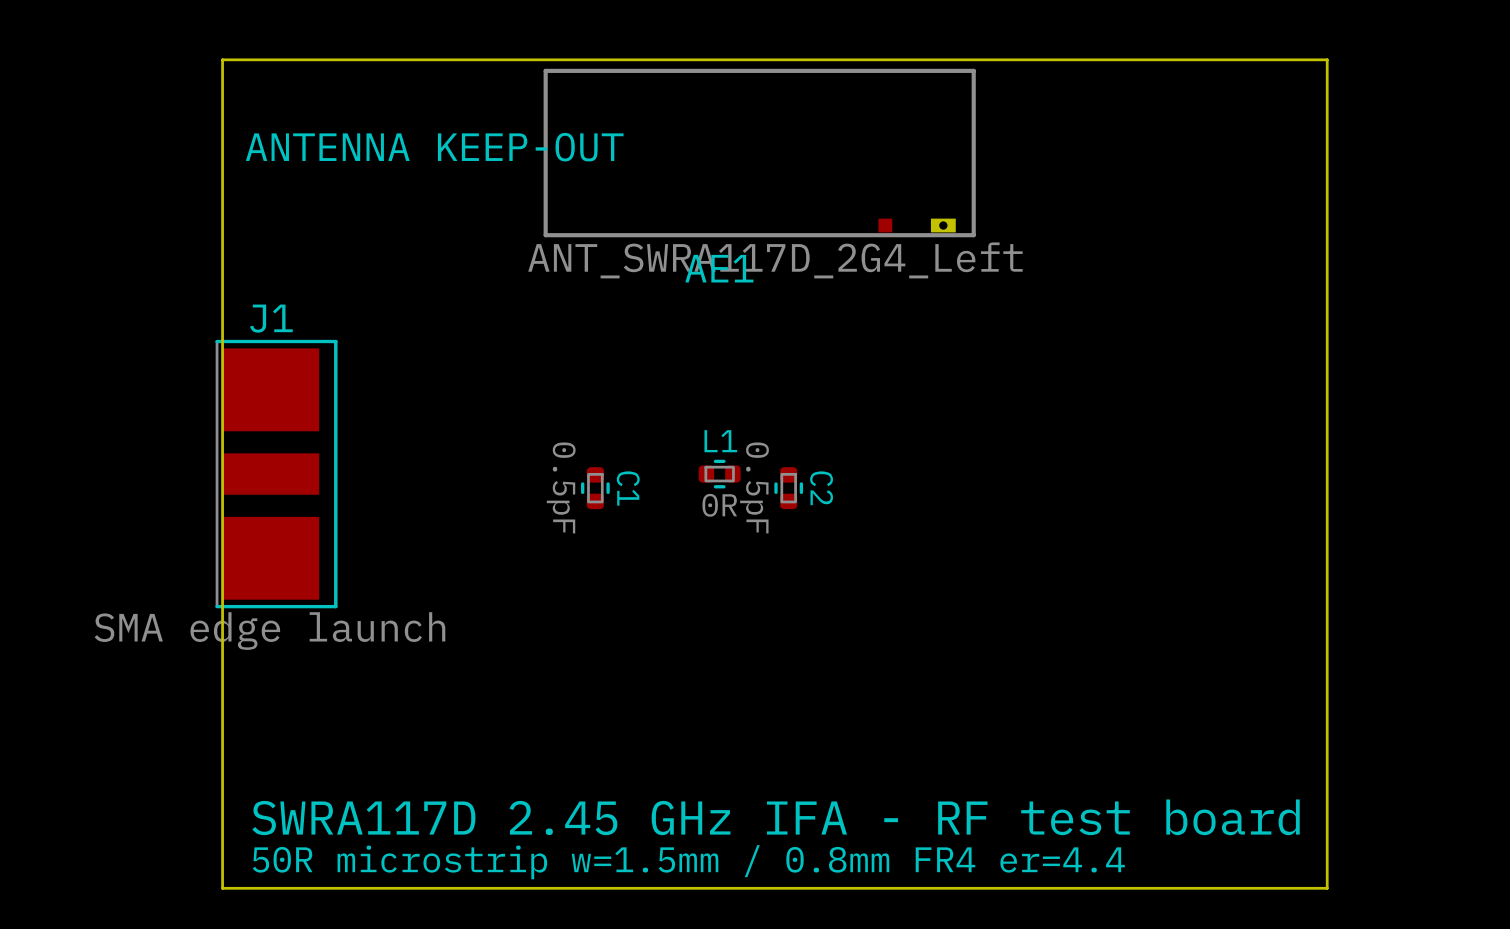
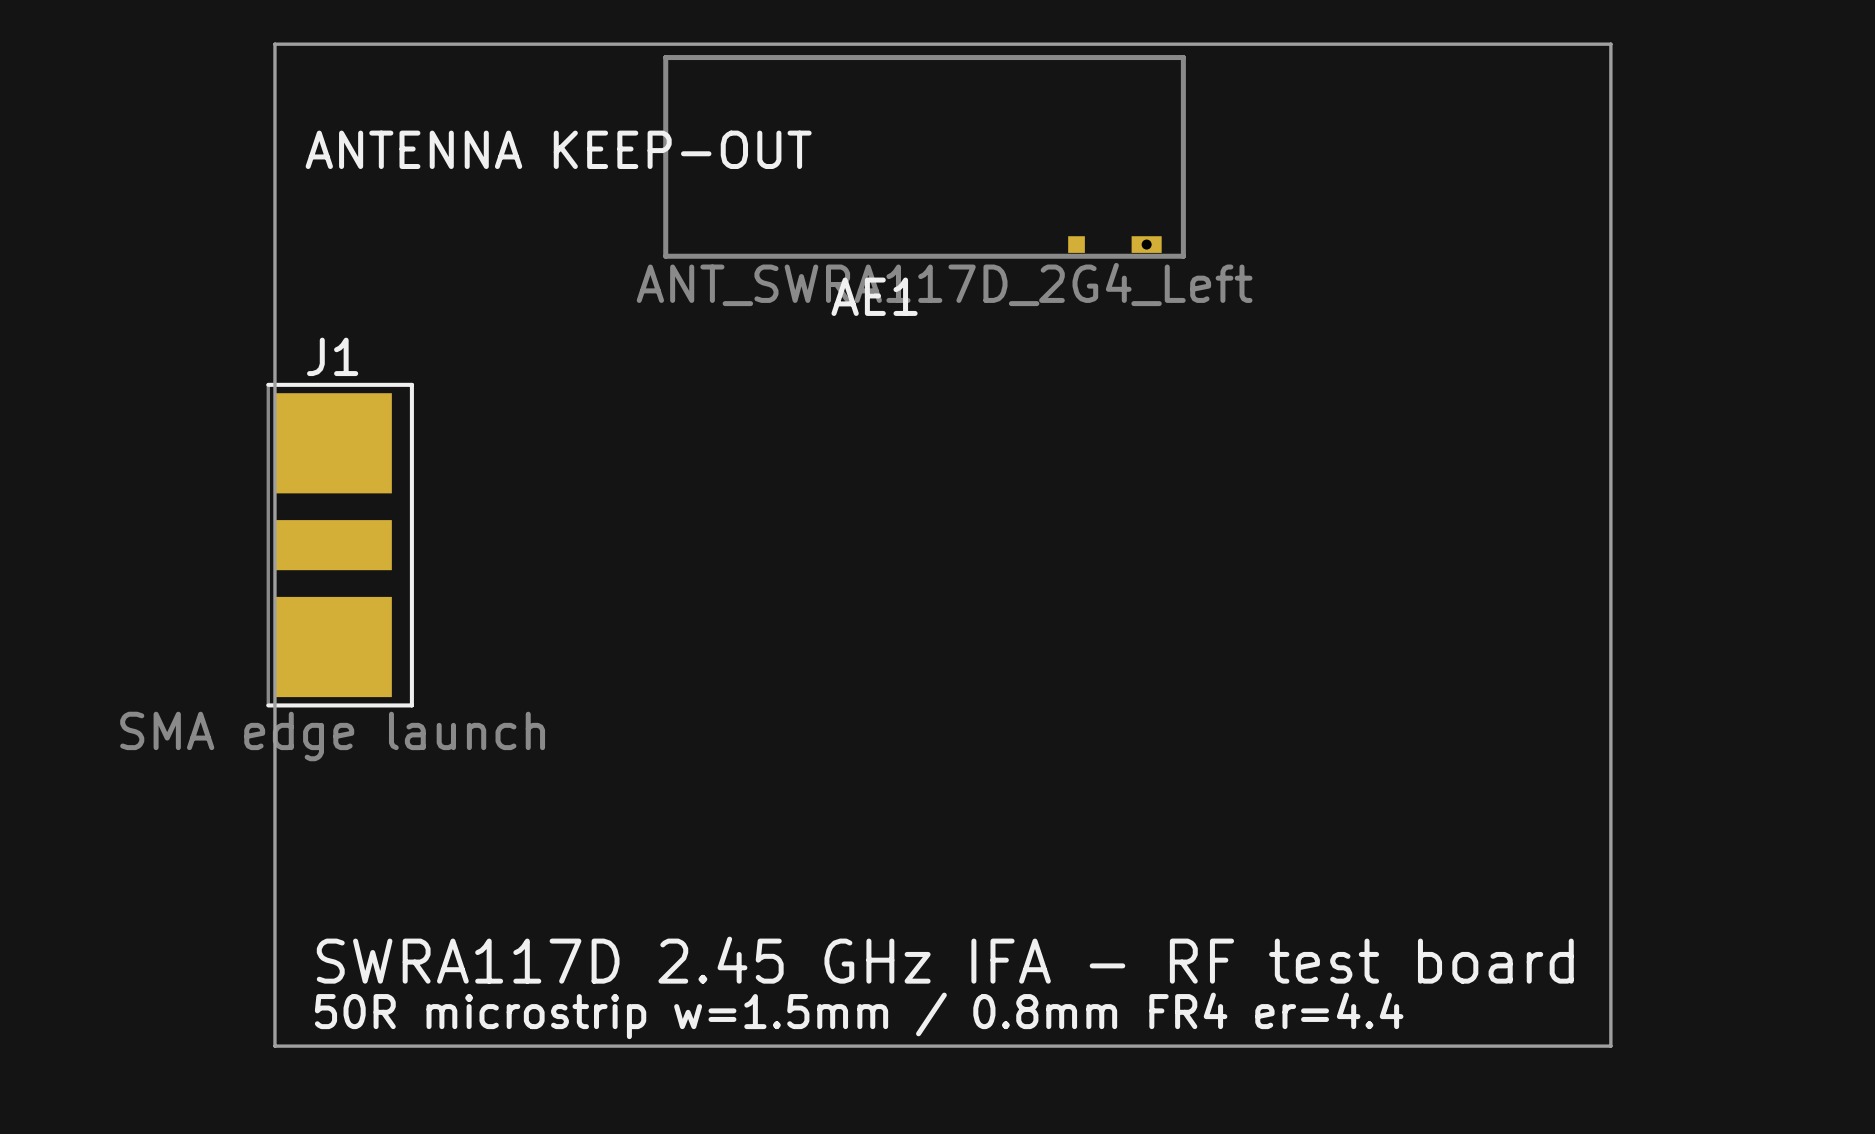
L1: 0R (719, 474) -> none
C1: 0.5pF (595, 488) -> none
C2: 0.5pF (788, 488) -> none

